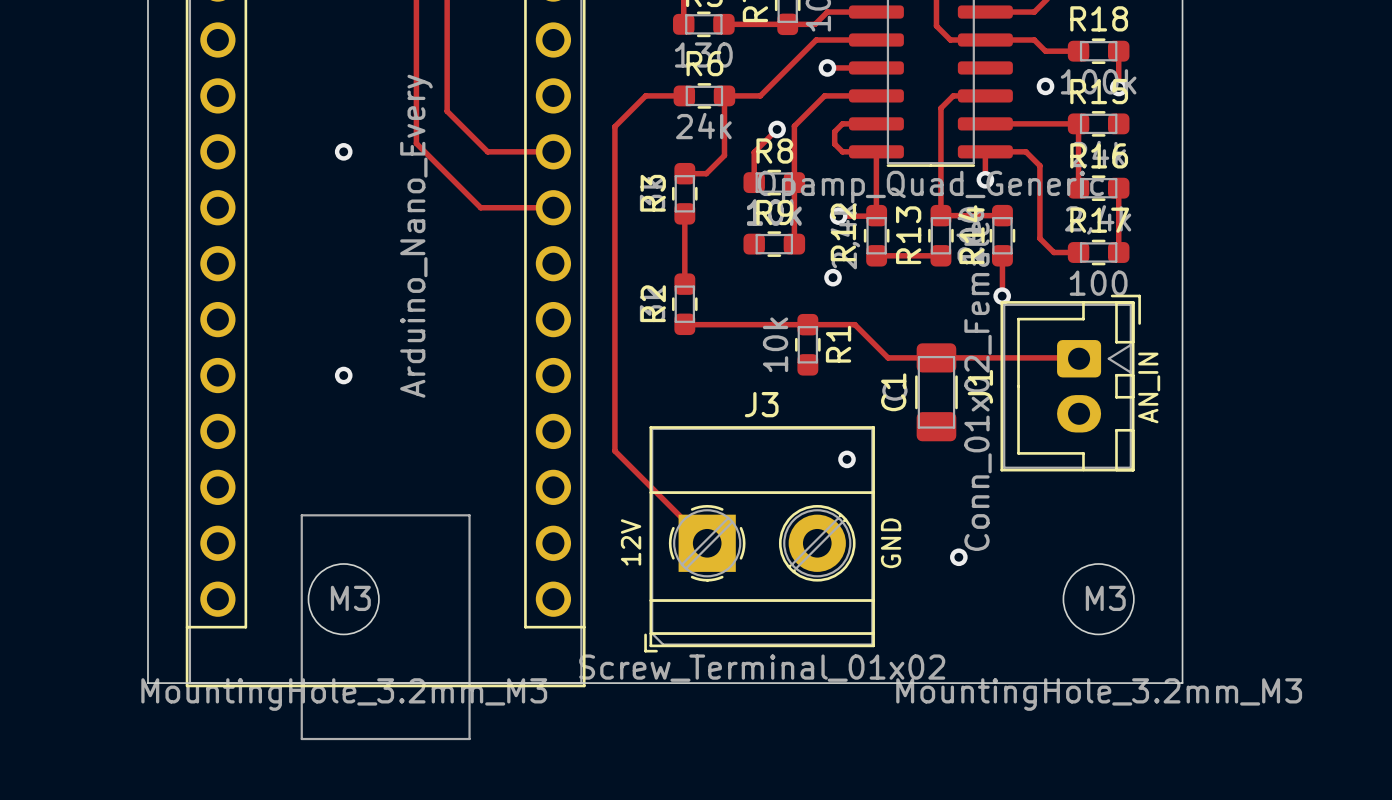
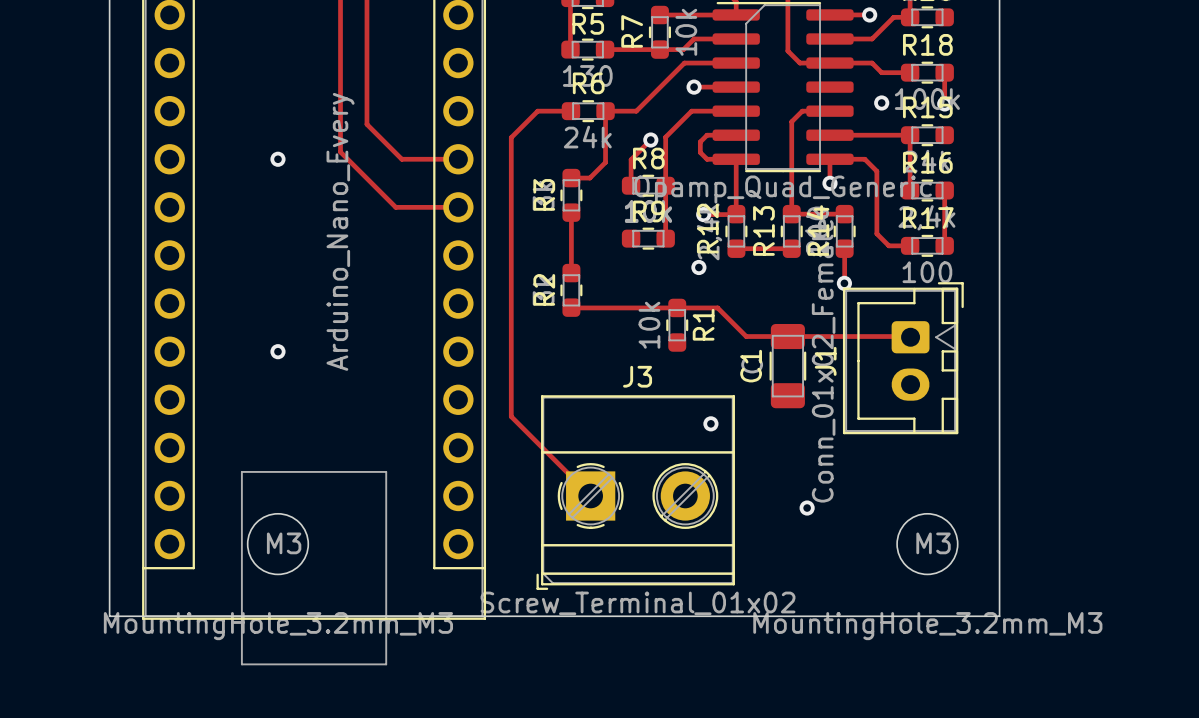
text: AN_IN (1149, 387) -> none
text: 12V (631, 542) -> none
text: GND (891, 543) -> none

